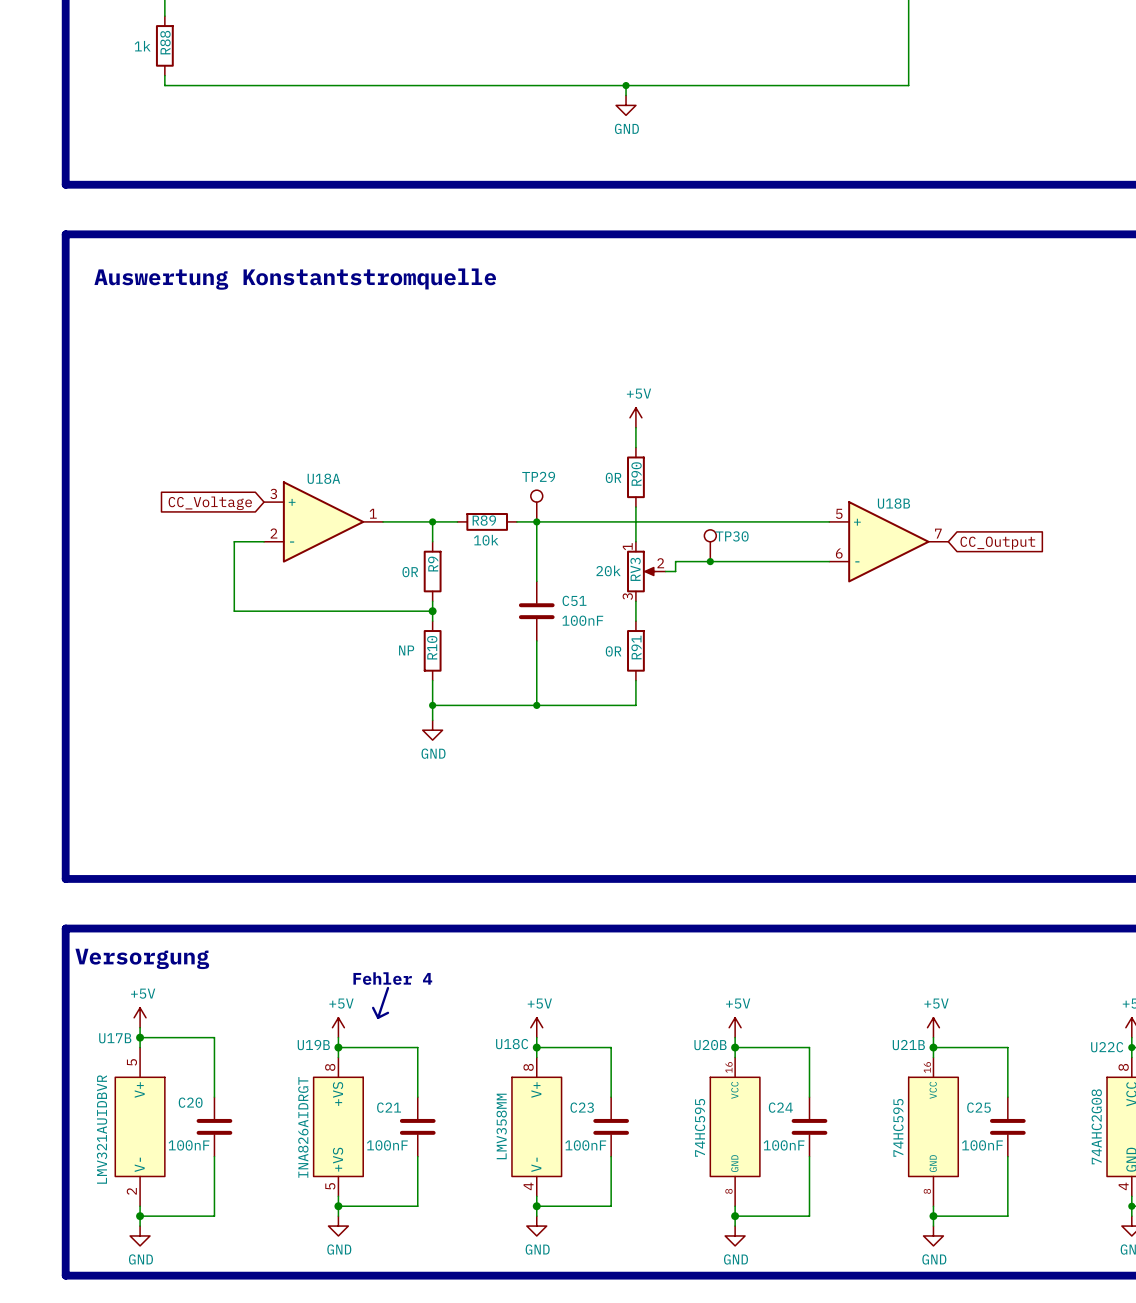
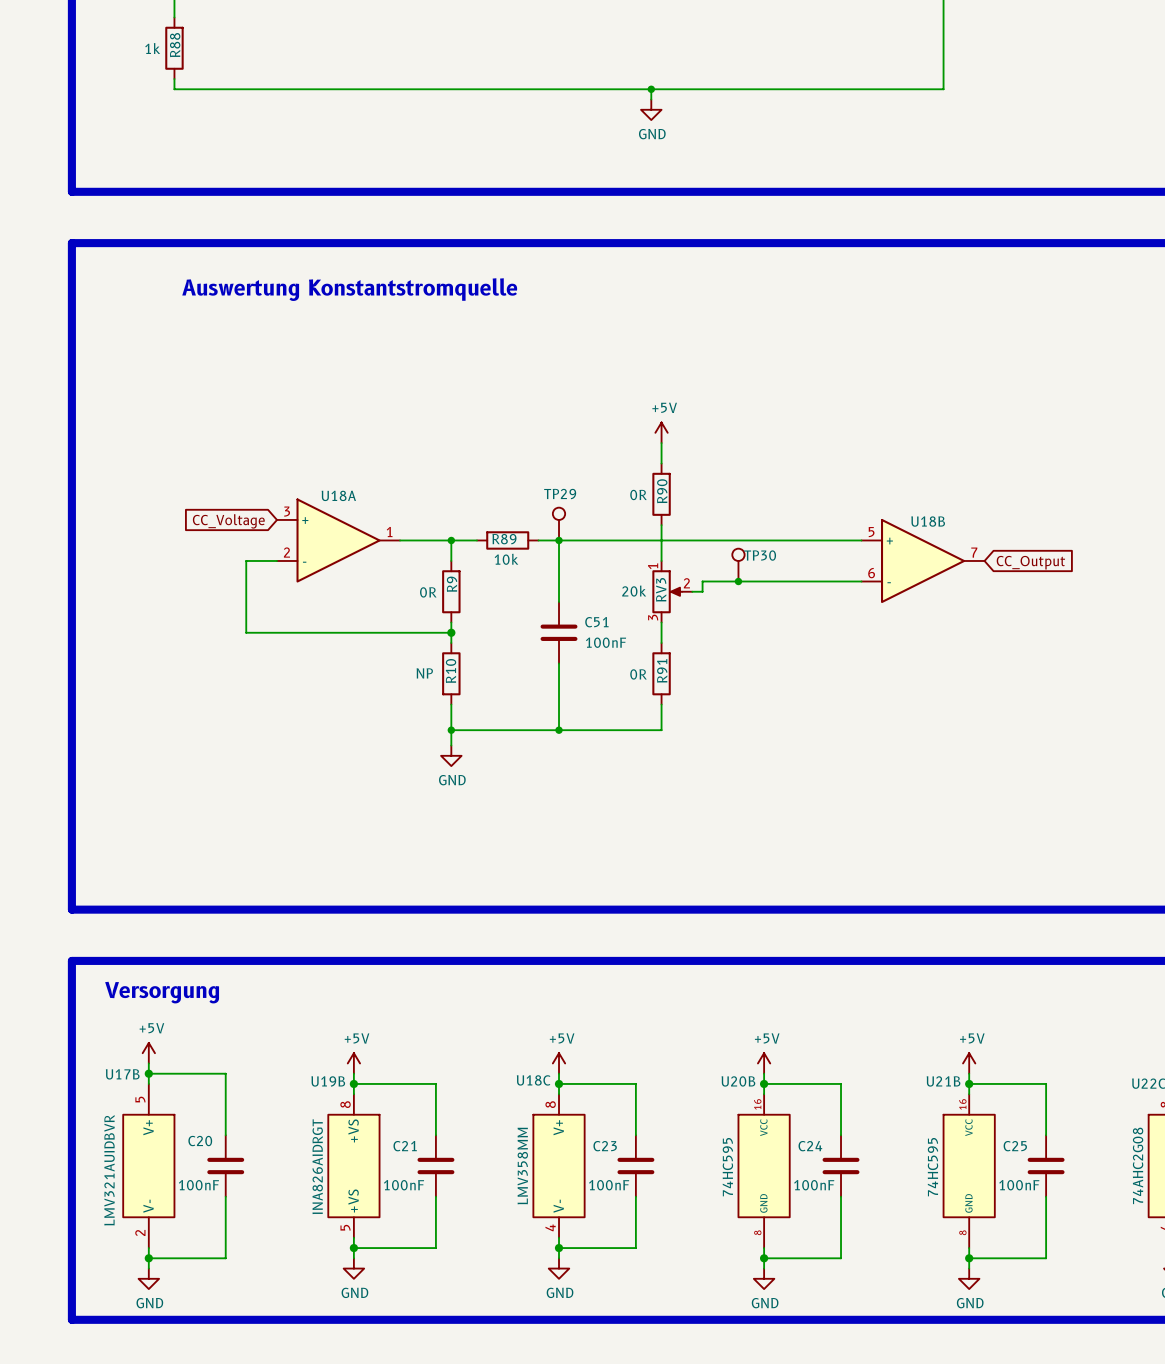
text: Fehler 4 (392, 978) -> none
line: (388, 988) (378, 1017) -> none
line: (373, 1007) (378, 1017) -> none
line: (388, 1012) (378, 1017) -> none

